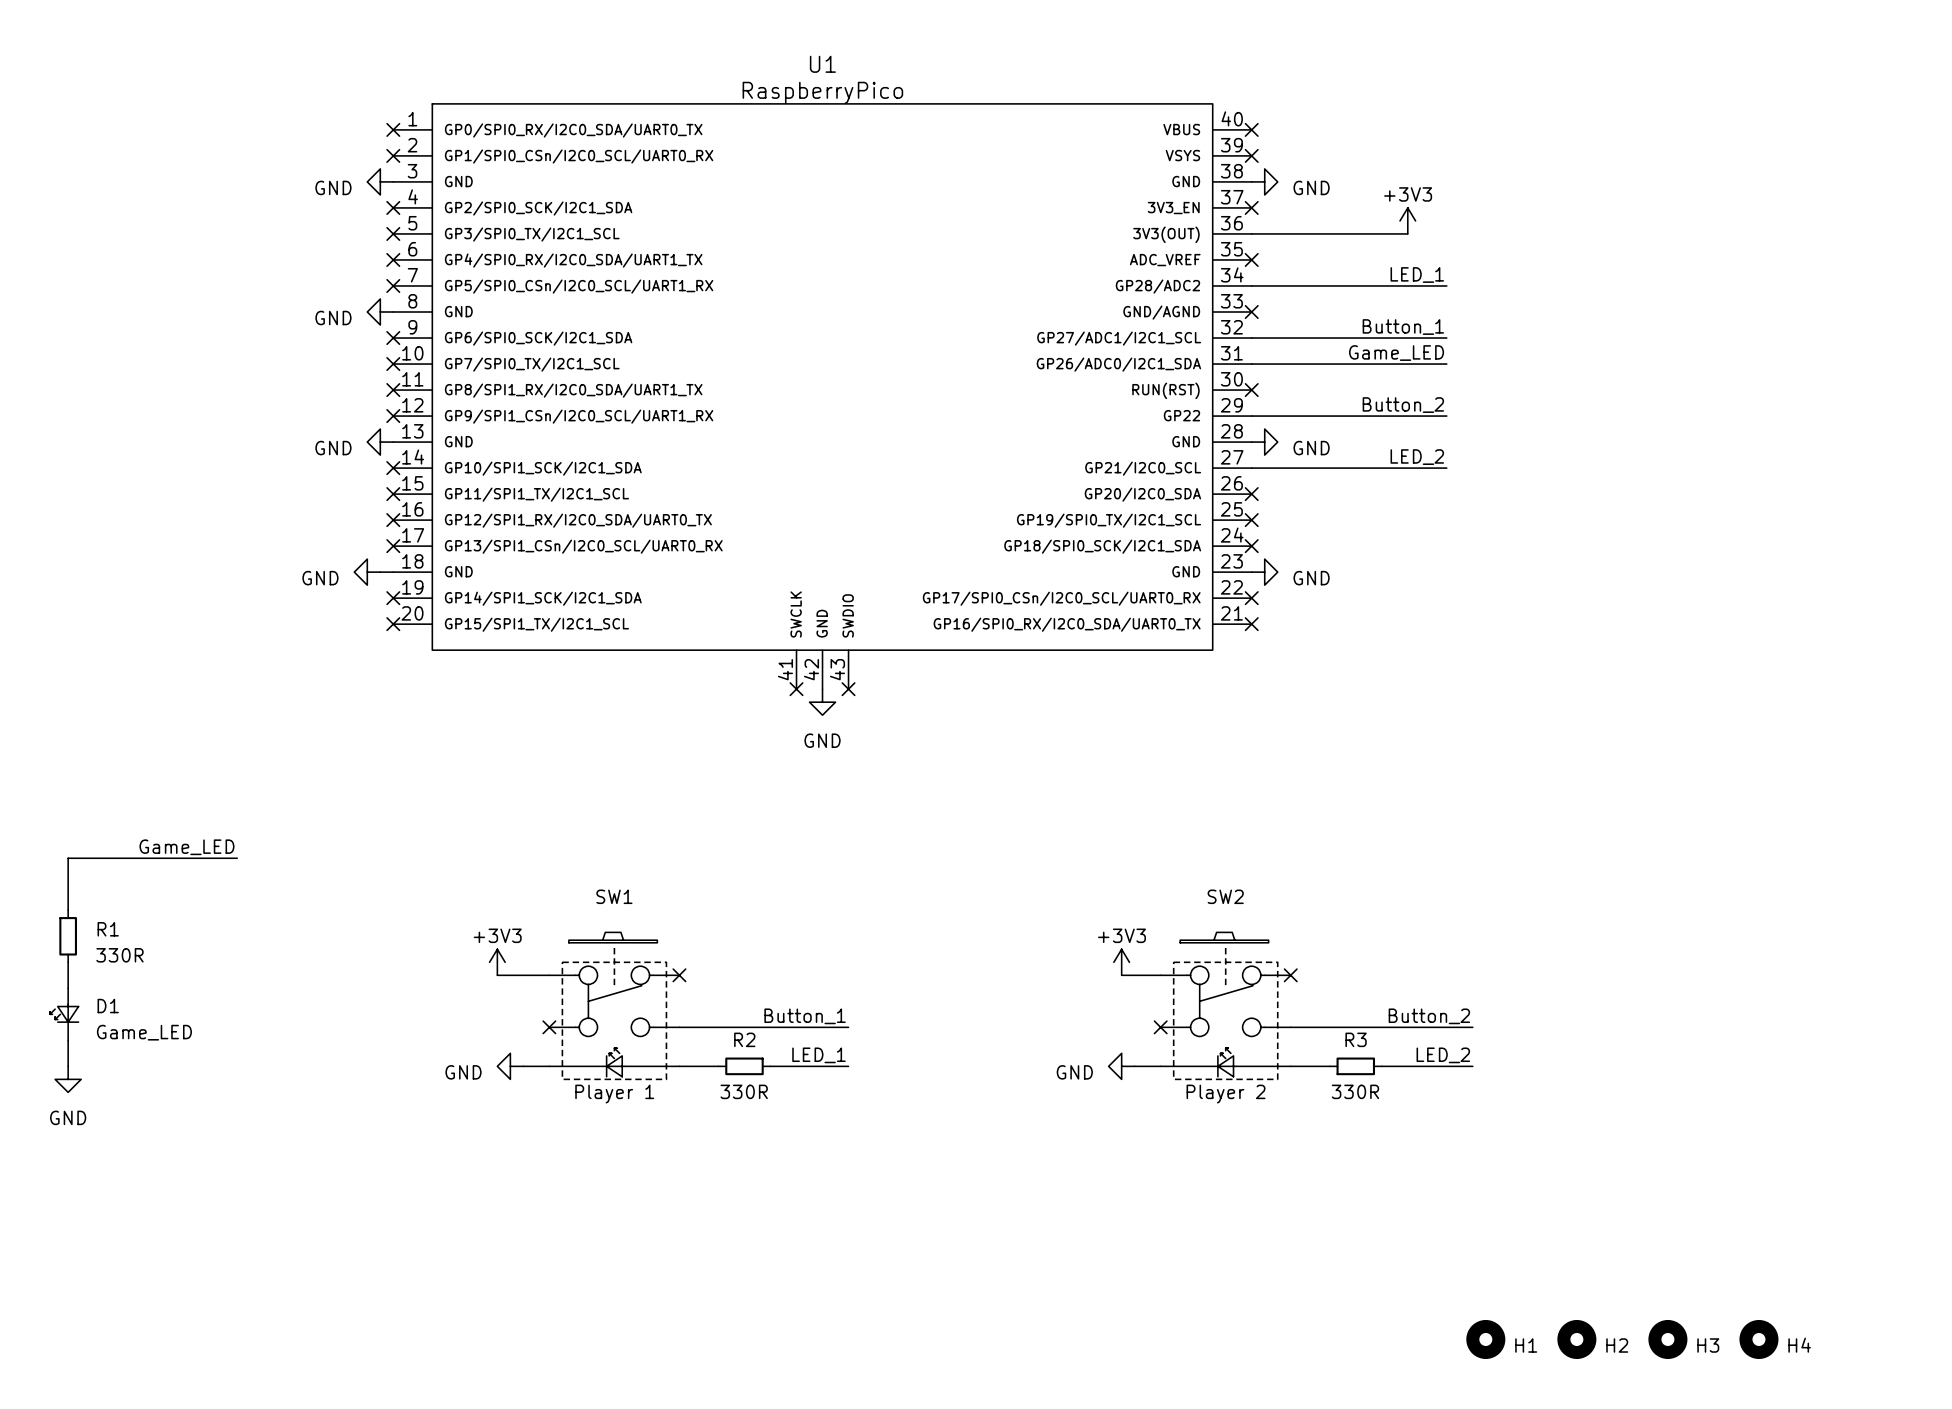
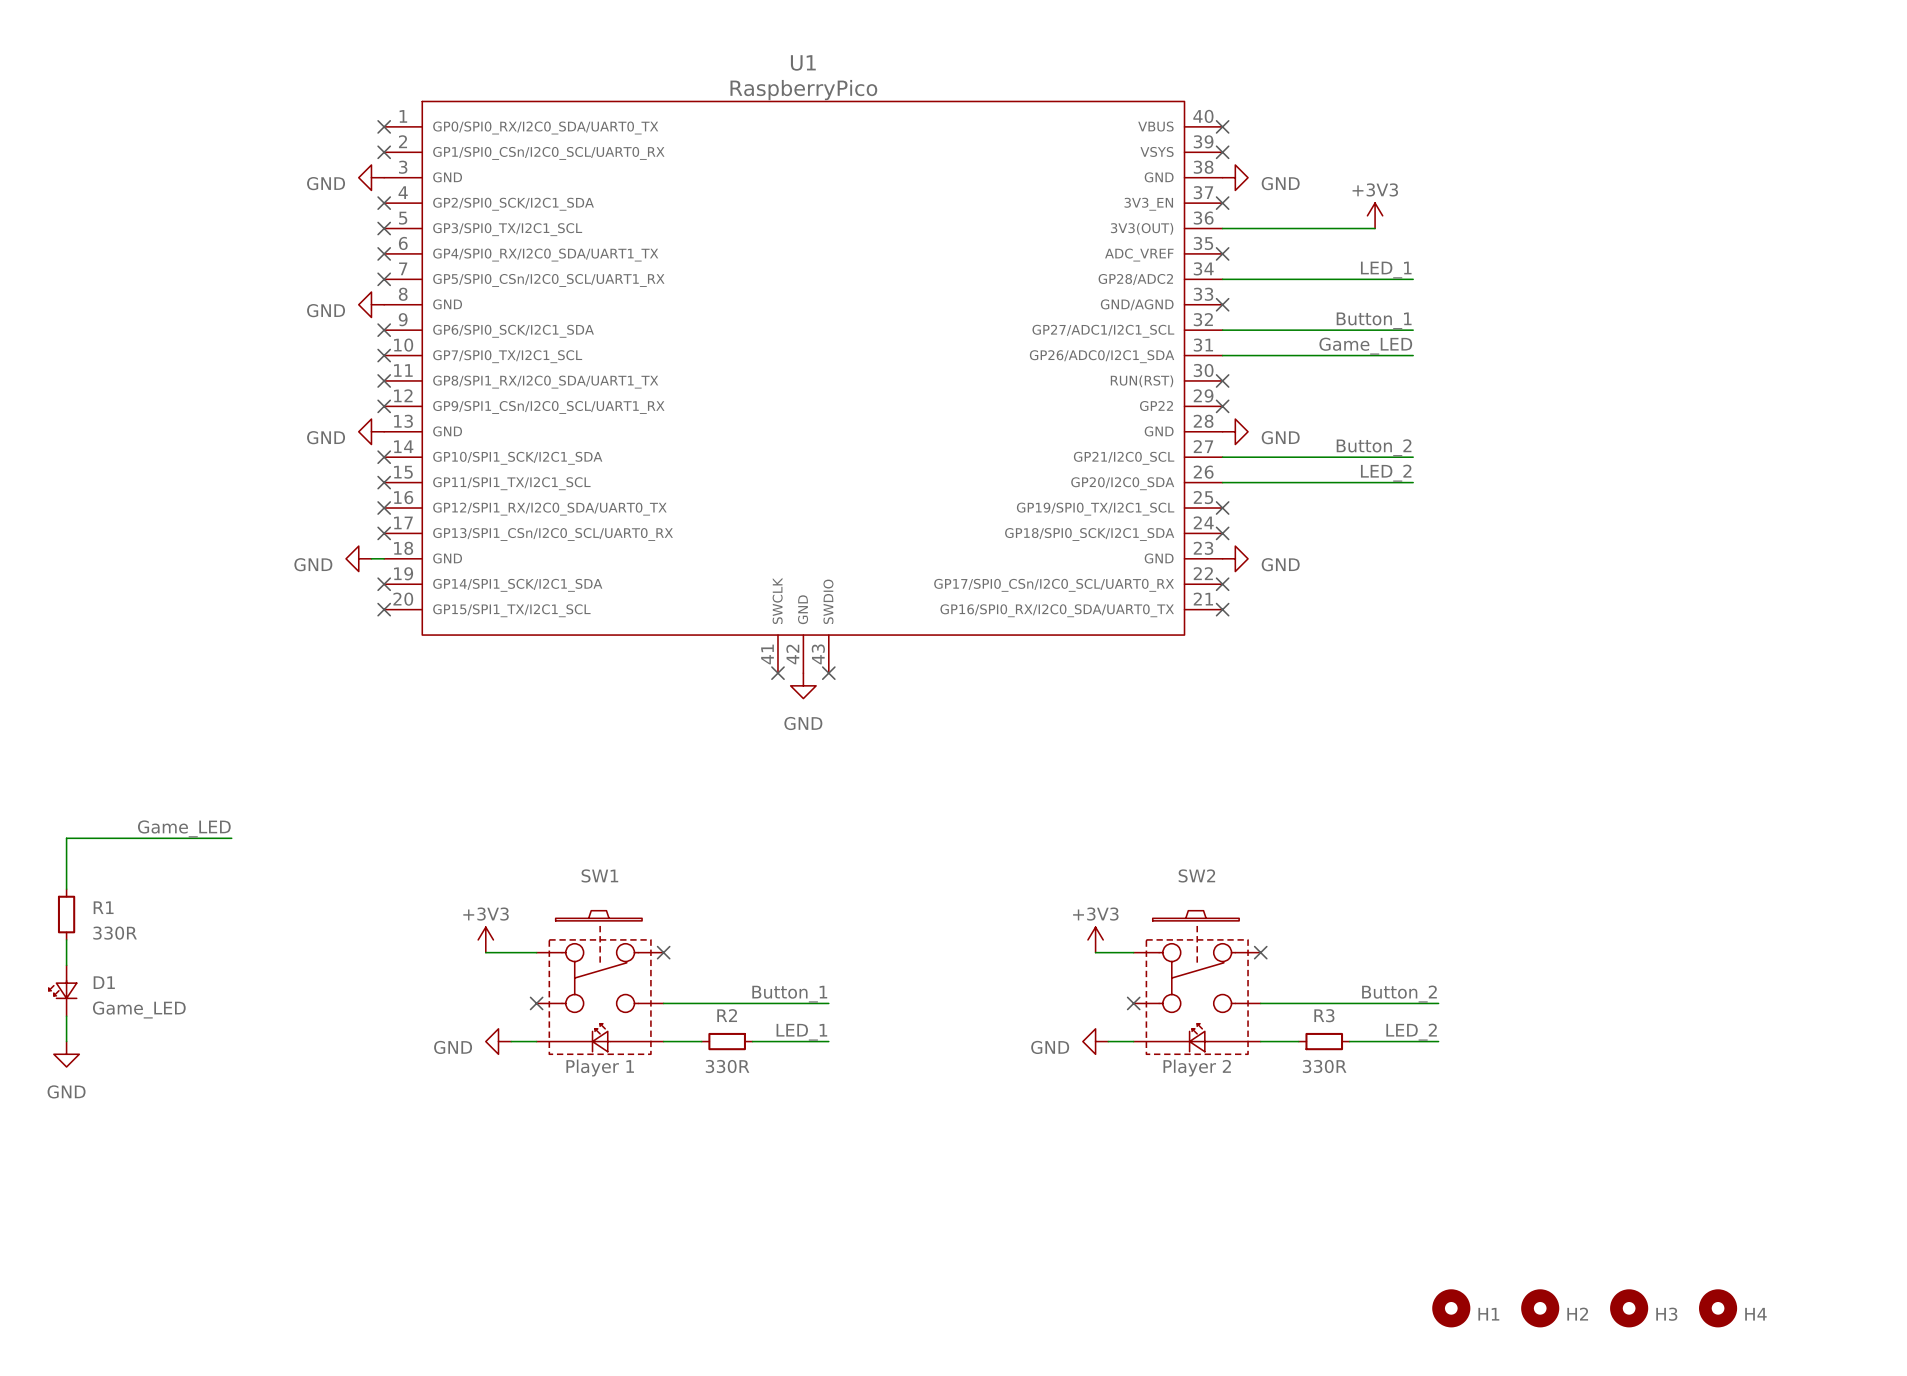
label: Button_2 (1403, 405) -> none
wire: (1251, 416) (1446, 416) -> (1222, 482) (1413, 482)
no-connect mark: none -> (1222, 406)
label: LED_2 (1417, 457) -> Button_2 (1374, 447)
label: none -> LED_2 (1386, 473)
no-connect mark: (1251, 494) -> none

